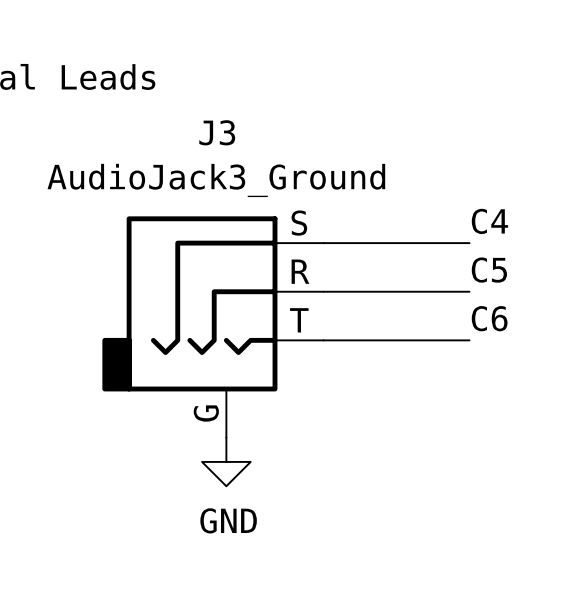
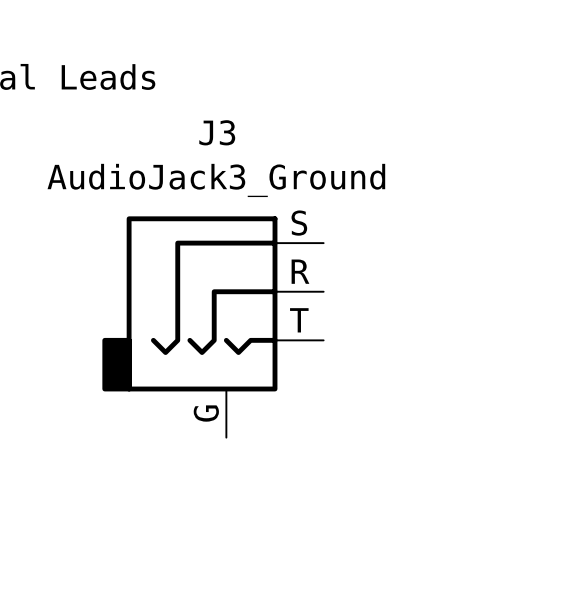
label: C4 (489, 221) -> none
wire: (323, 243) (469, 243) -> none
label: C5 (489, 270) -> none
wire: (323, 291) (469, 291) -> none
label: C6 (489, 318) -> none
wire: (323, 340) (469, 340) -> none
power symbol: GND (226, 461) -> none

